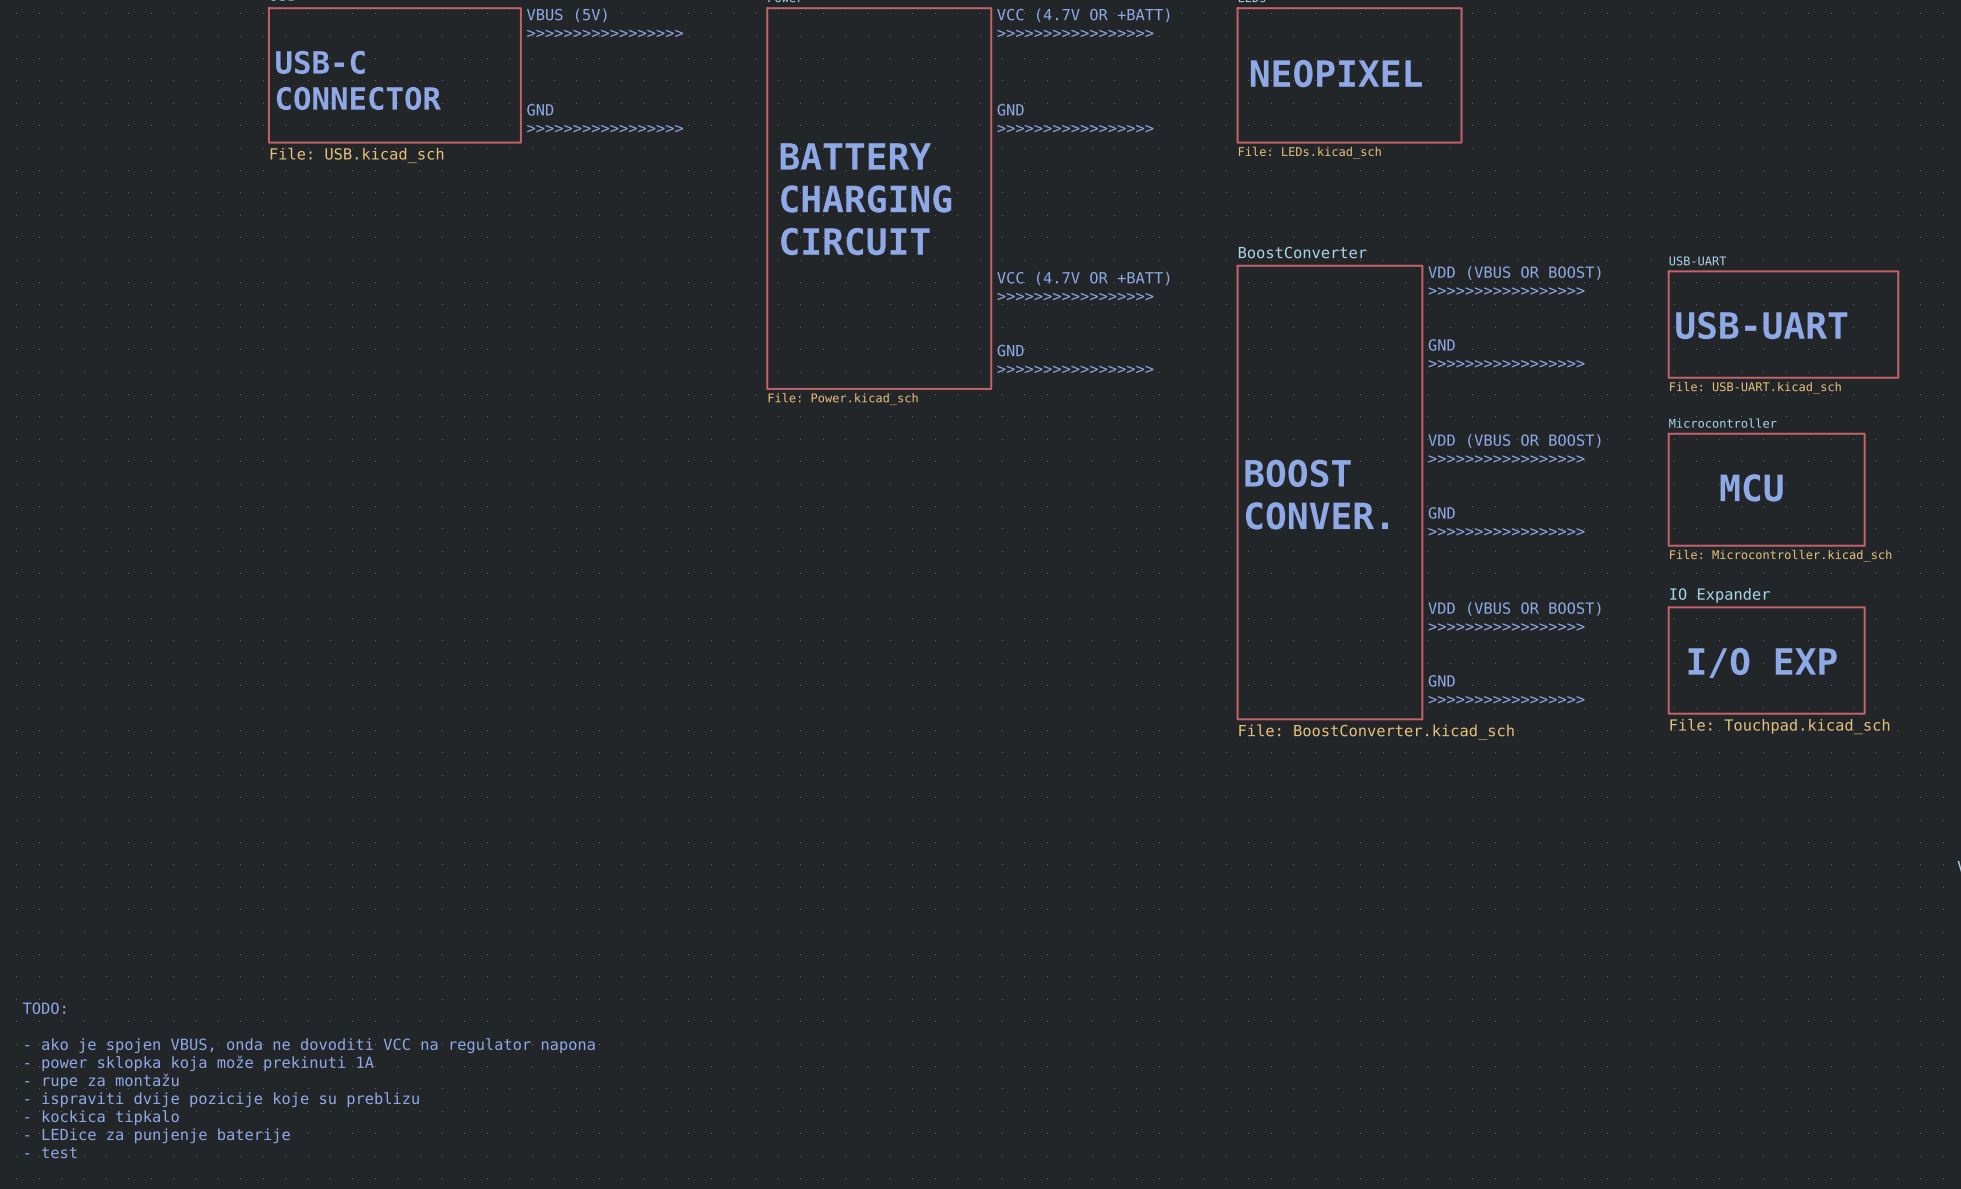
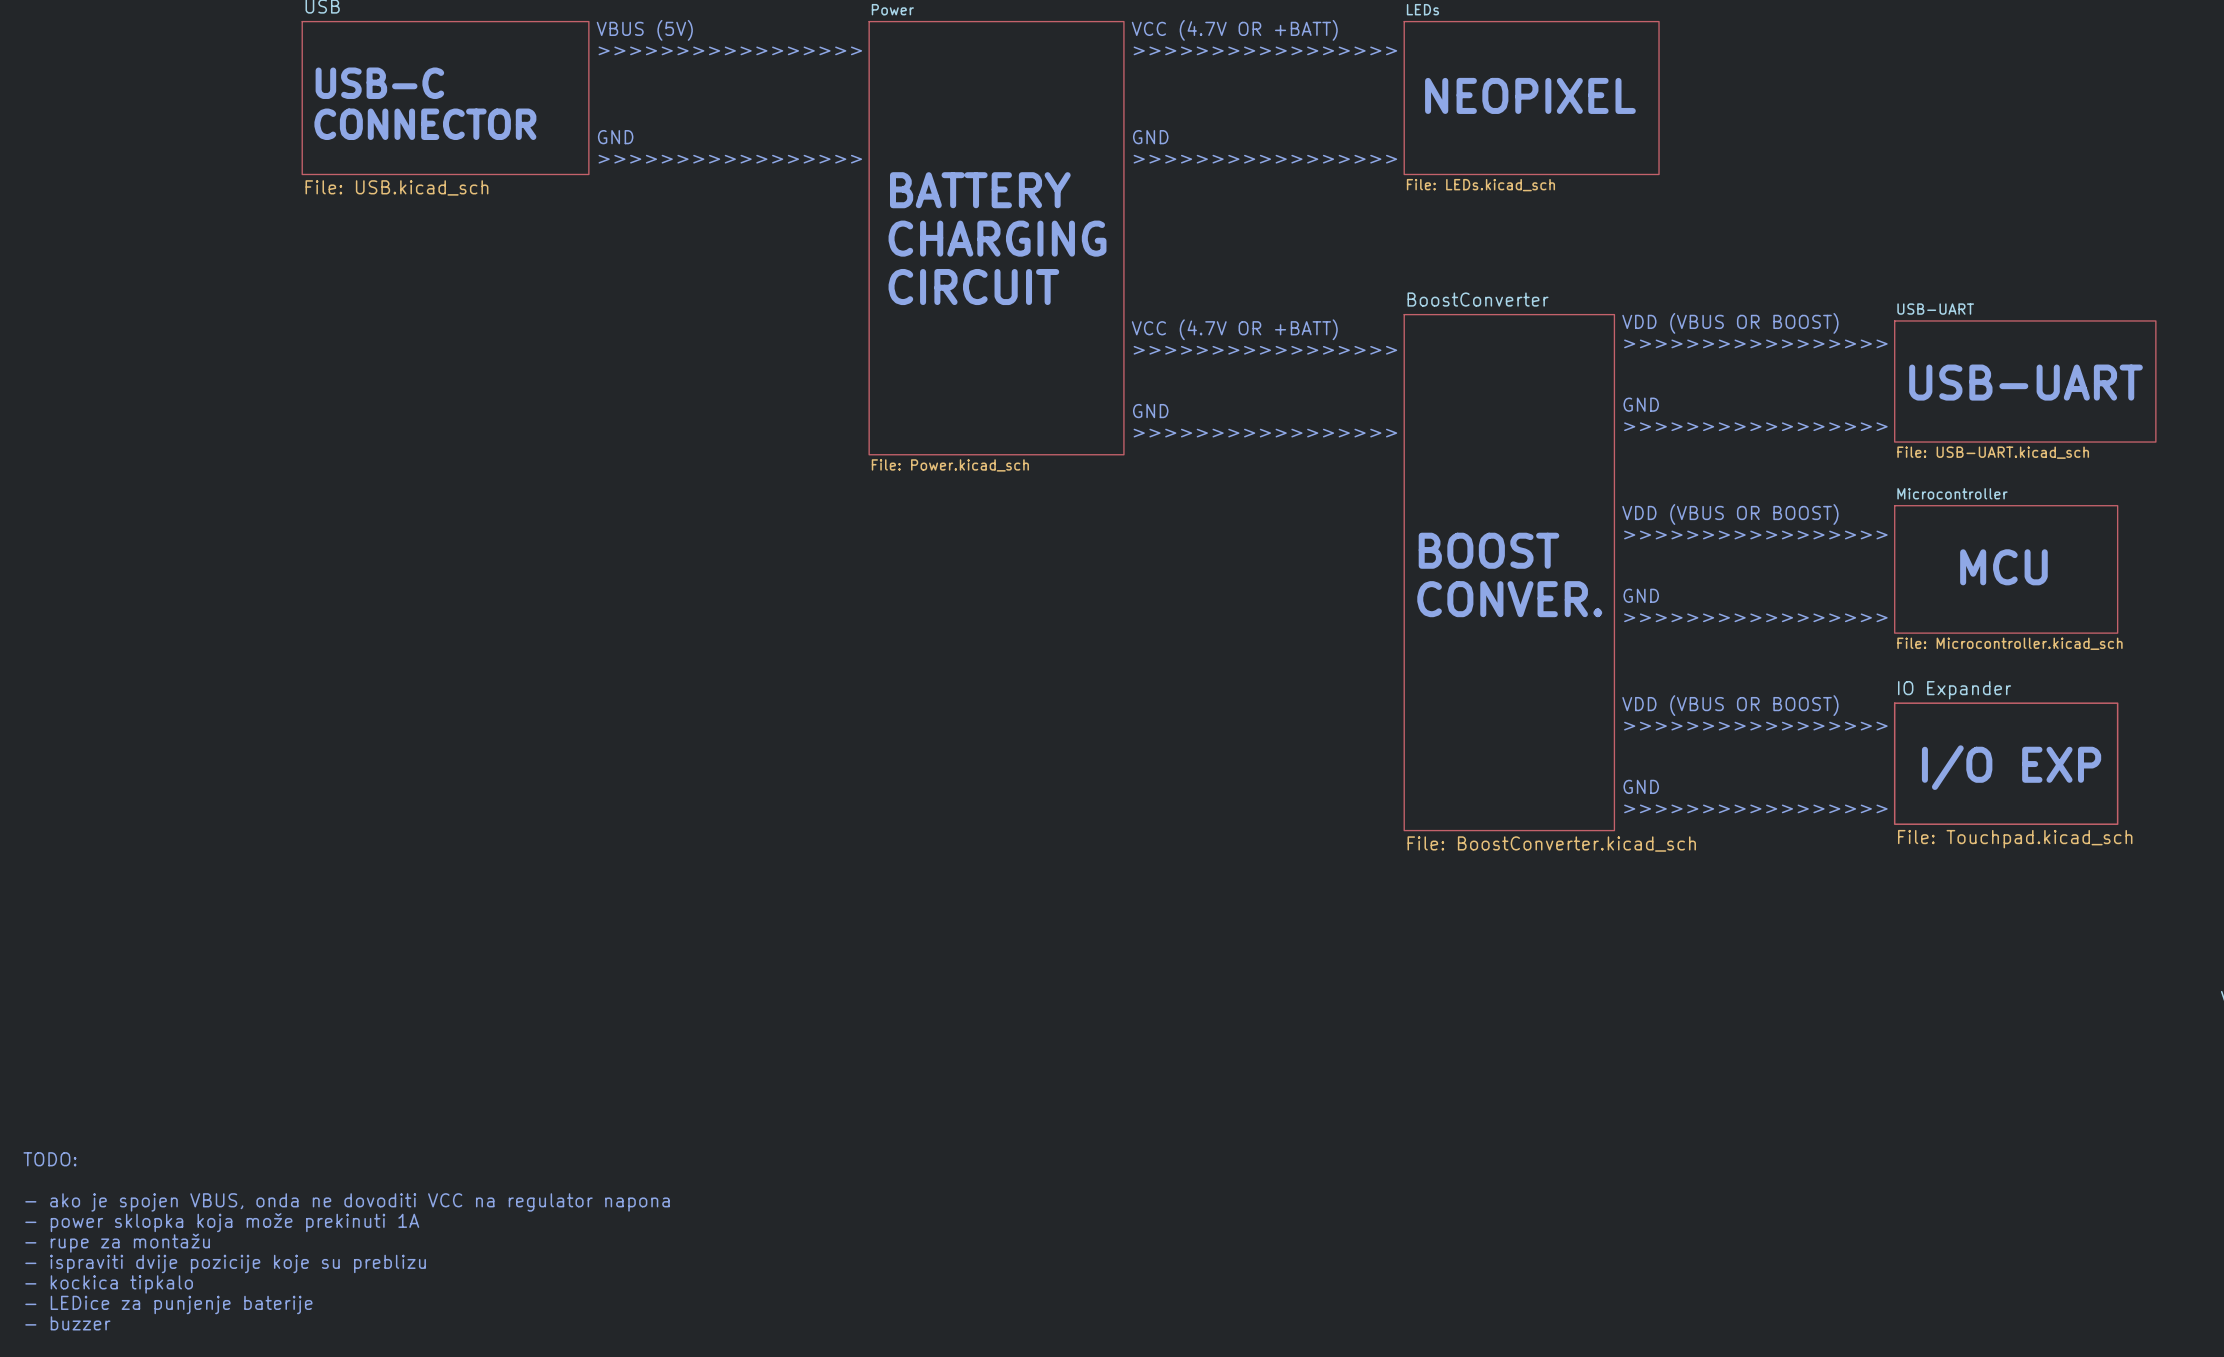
text: - test (50, 1152) -> - buzzer (67, 1323)

